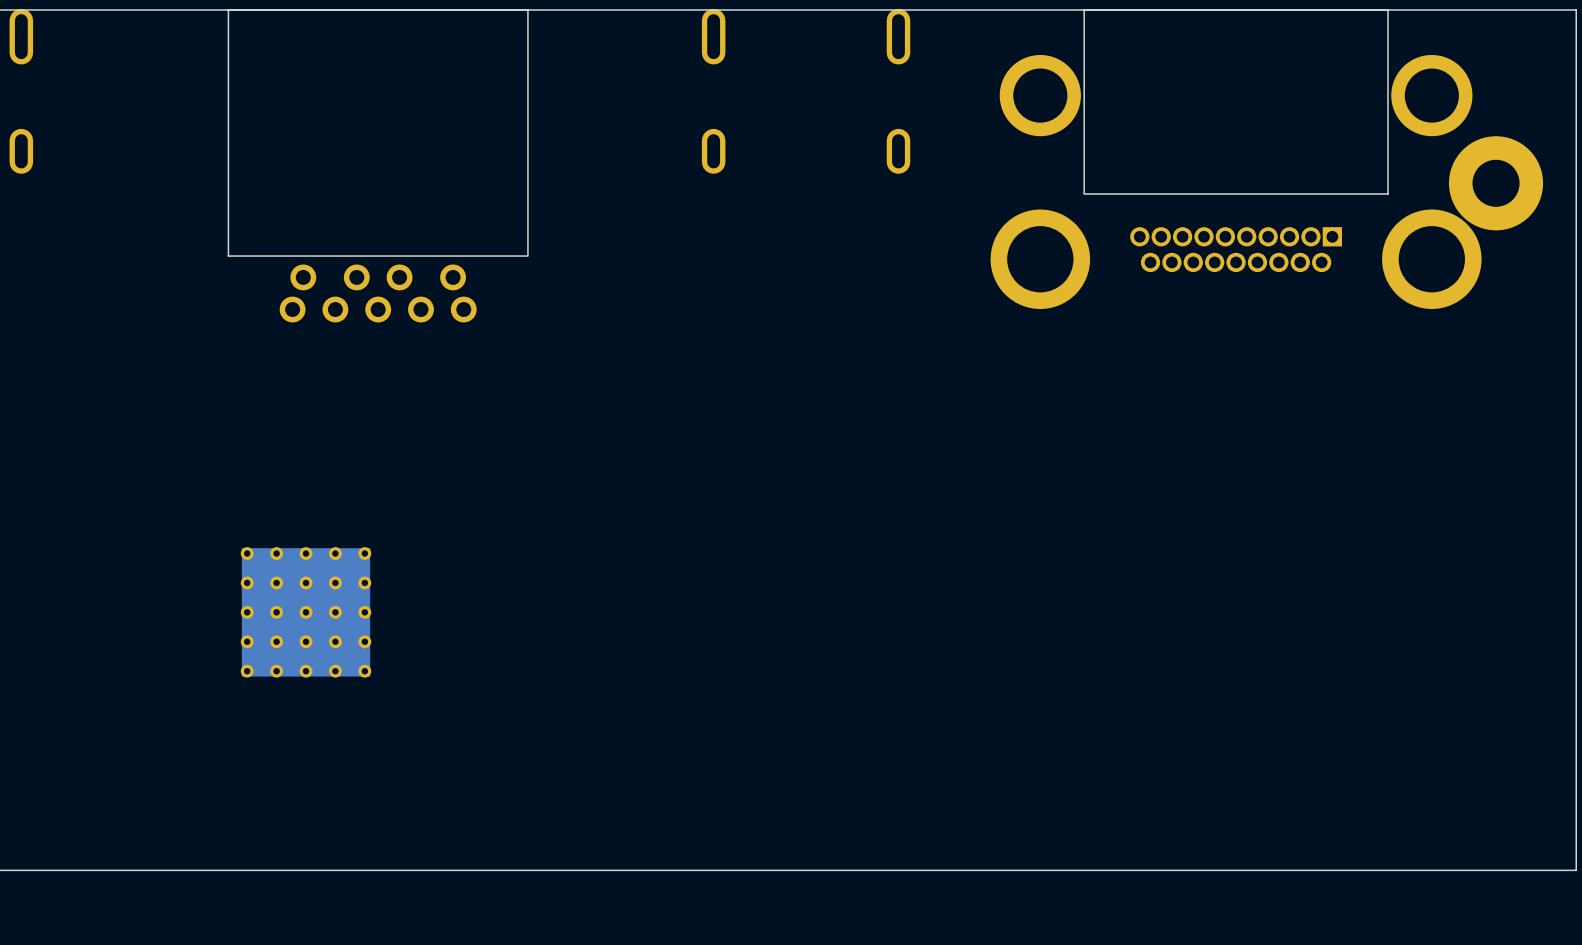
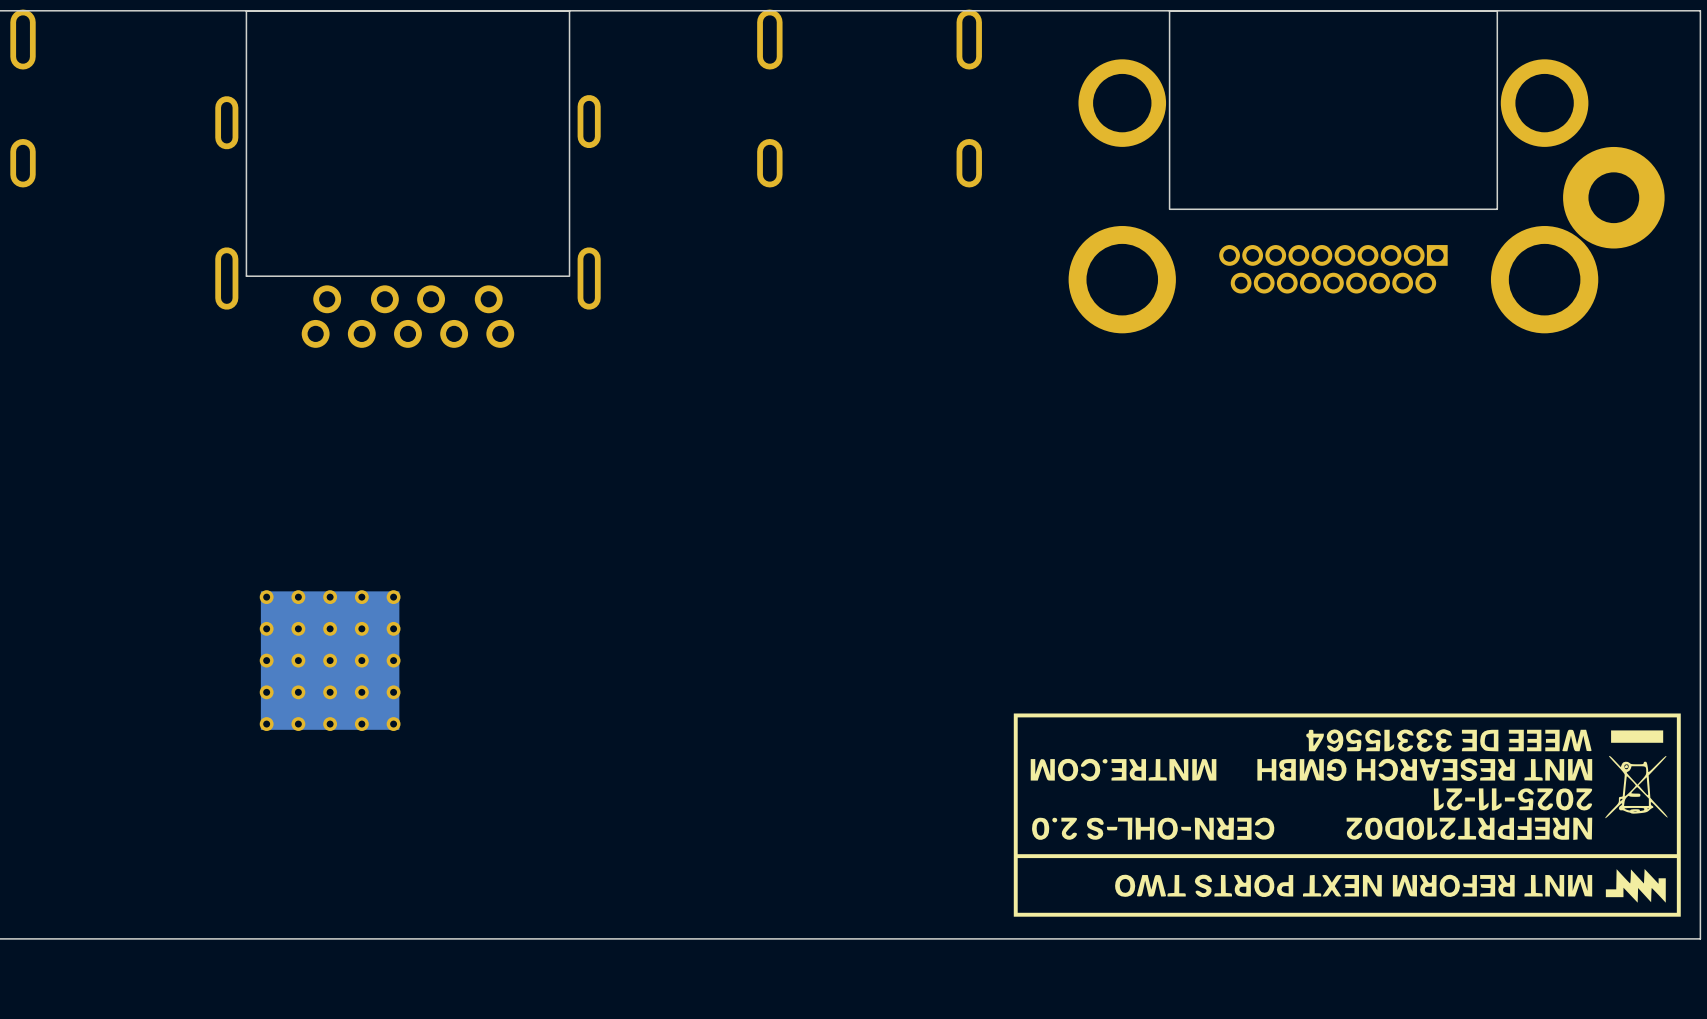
part footprint: [204, 9, 552, 323] -> [215, 10, 601, 348]
drawing: none -> [1013, 713, 1681, 917]

